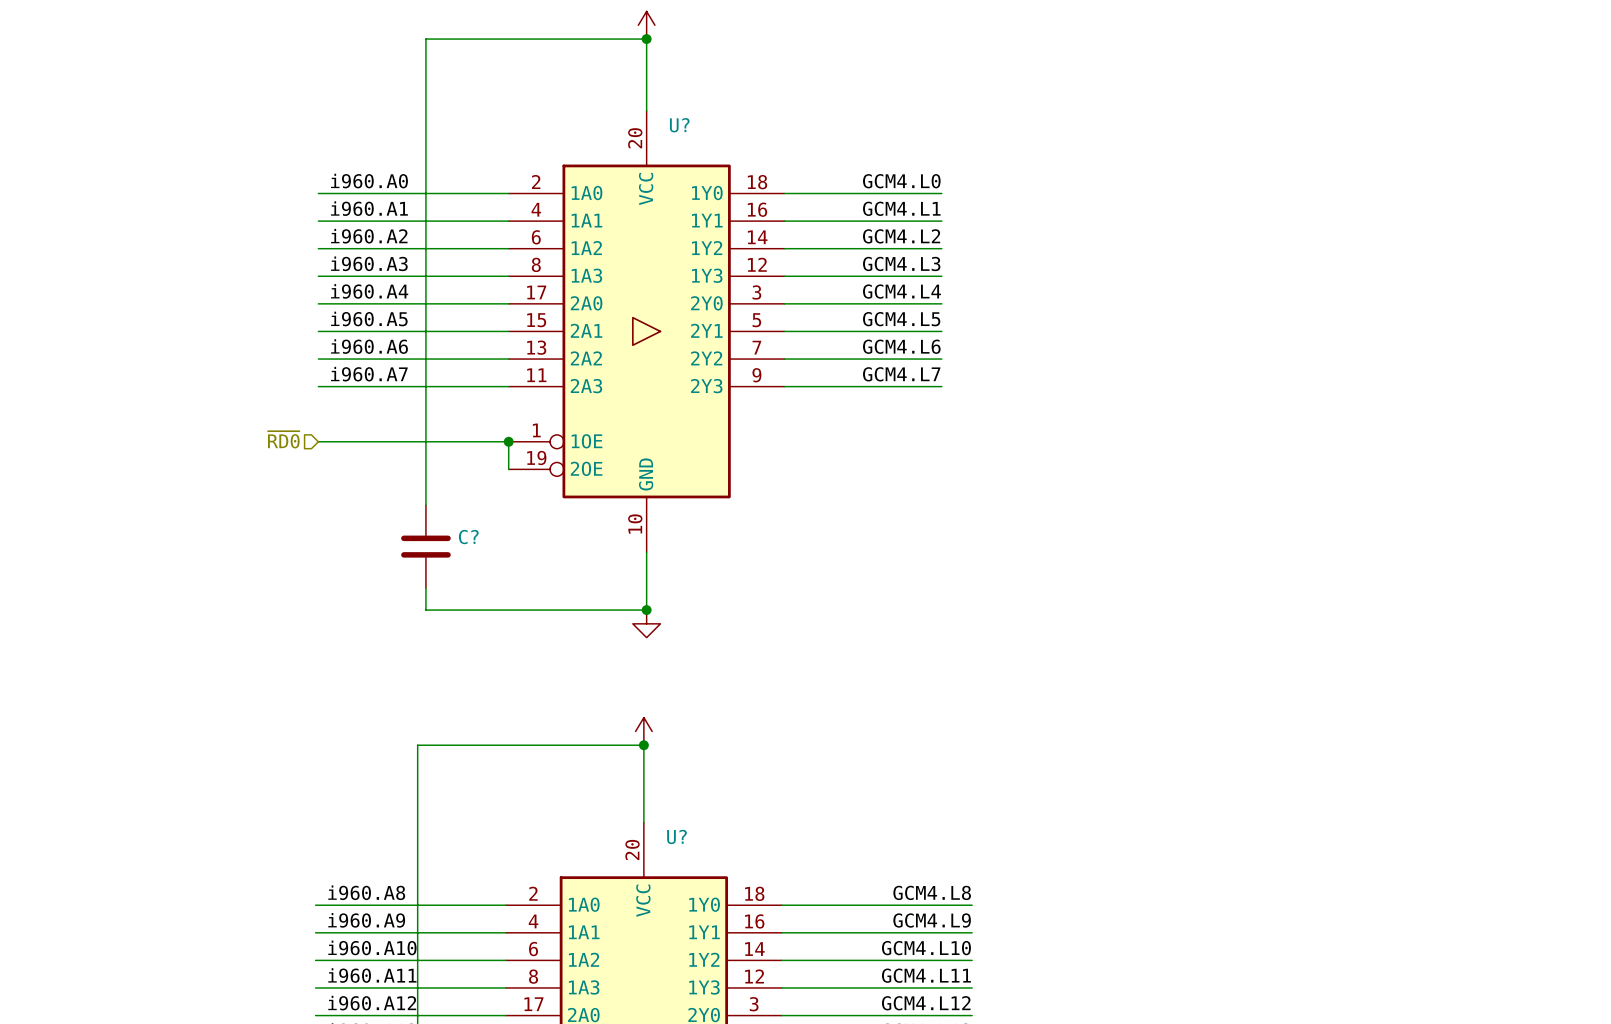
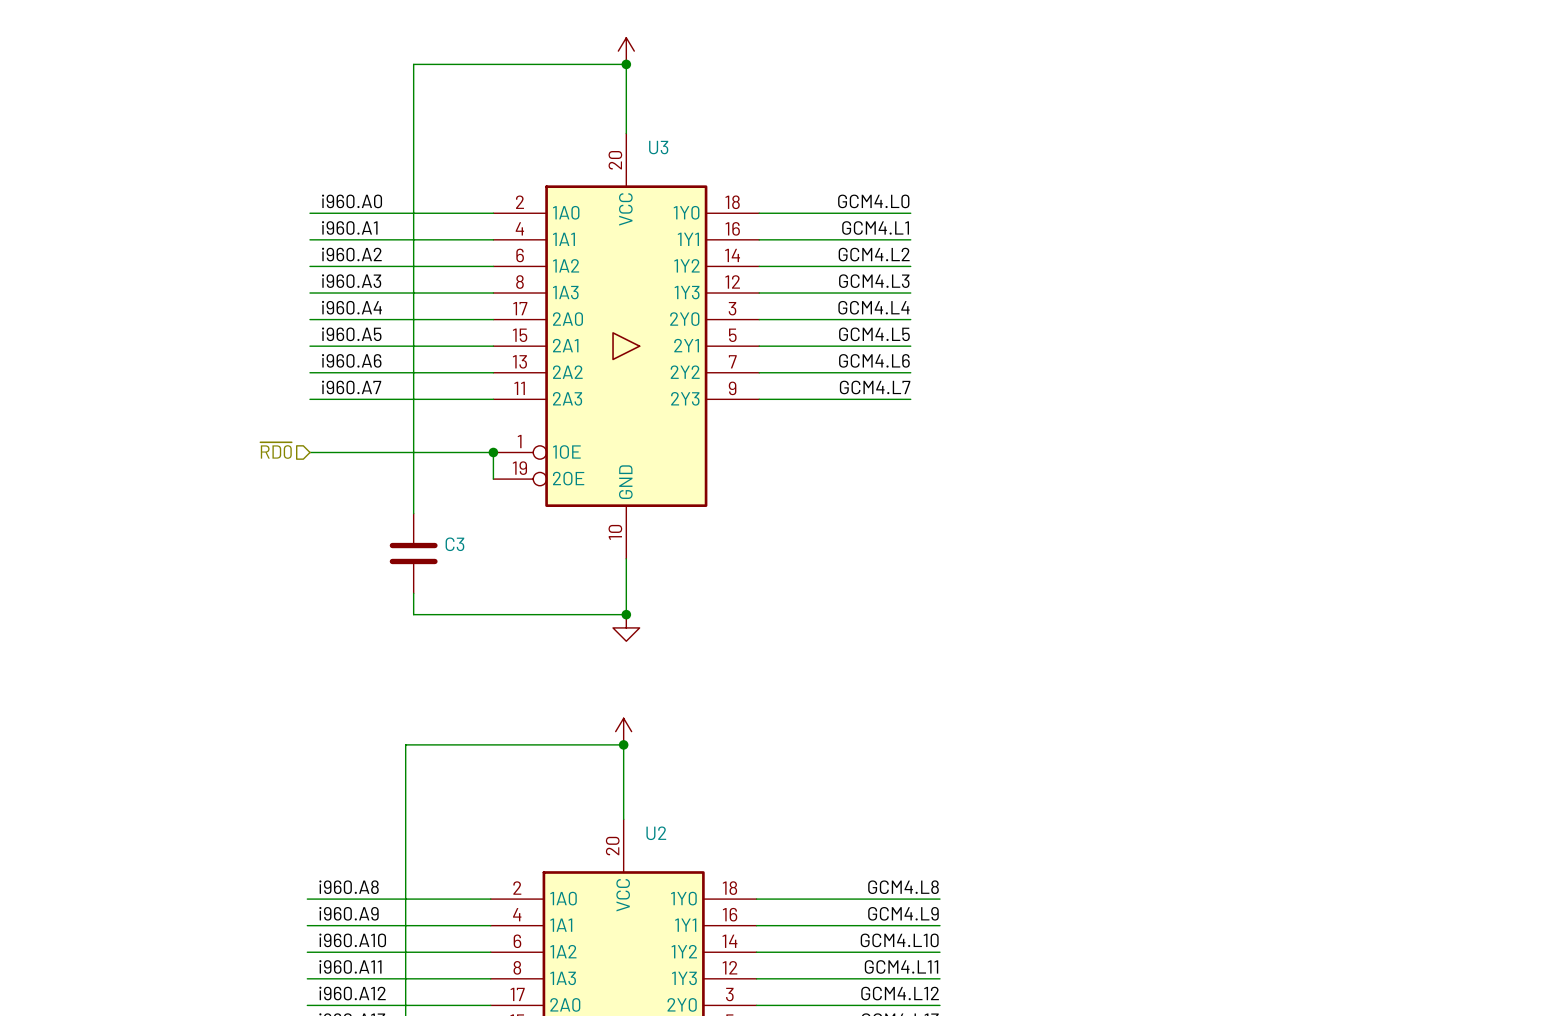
U? name: U? (679, 125) -> U3 (658, 147)
C? name: C? (468, 537) -> C3 (454, 544)
U? name: U? (676, 836) -> U2 (656, 833)

